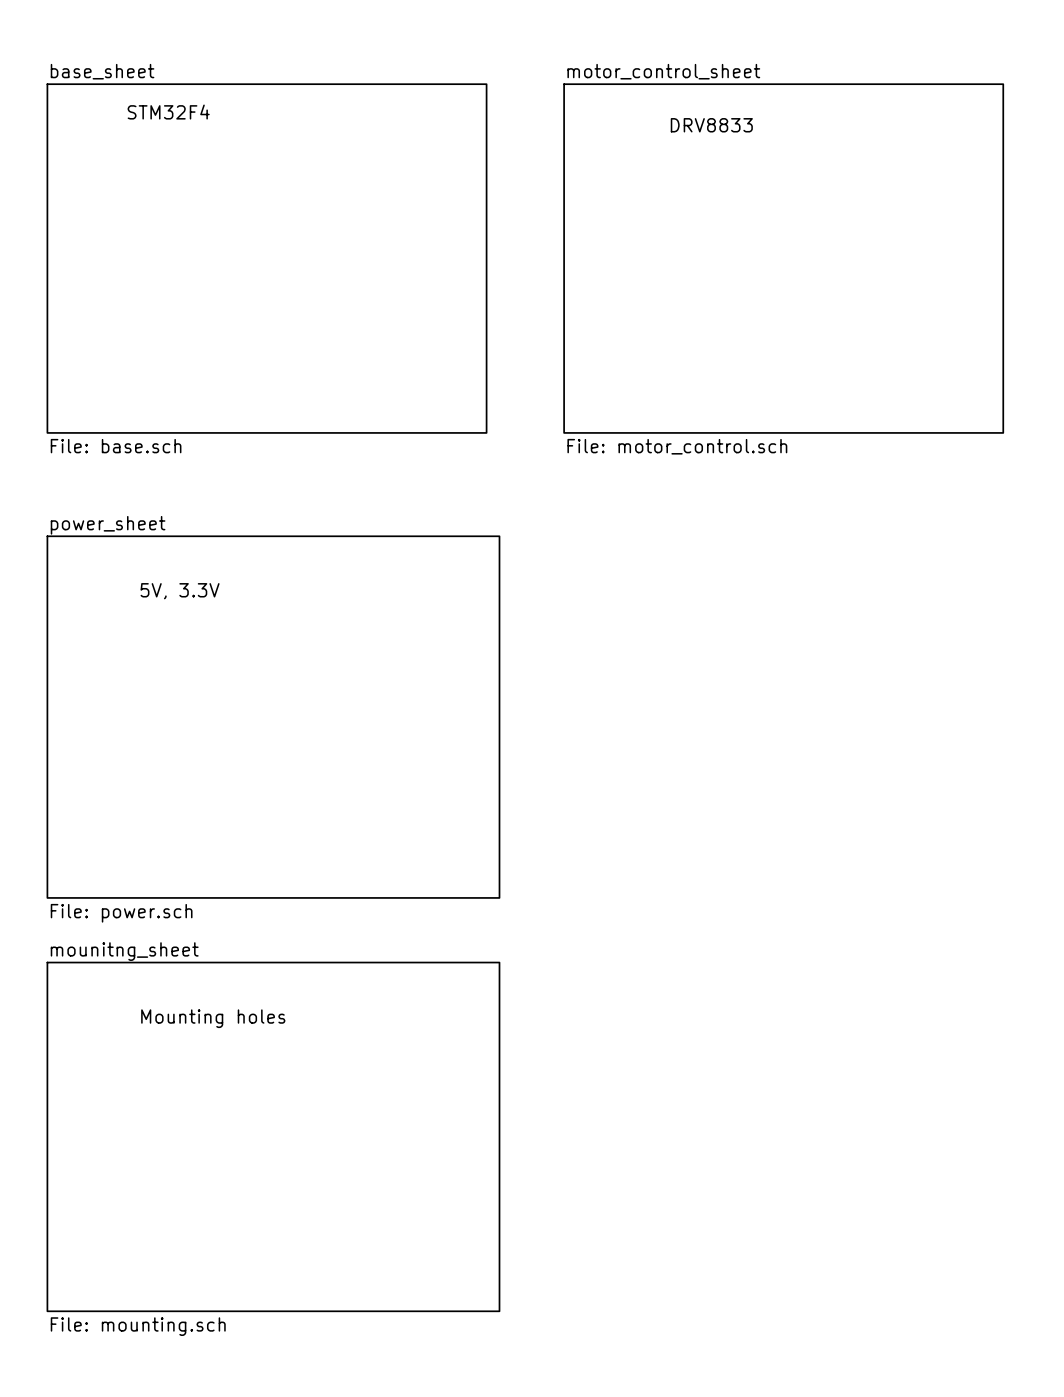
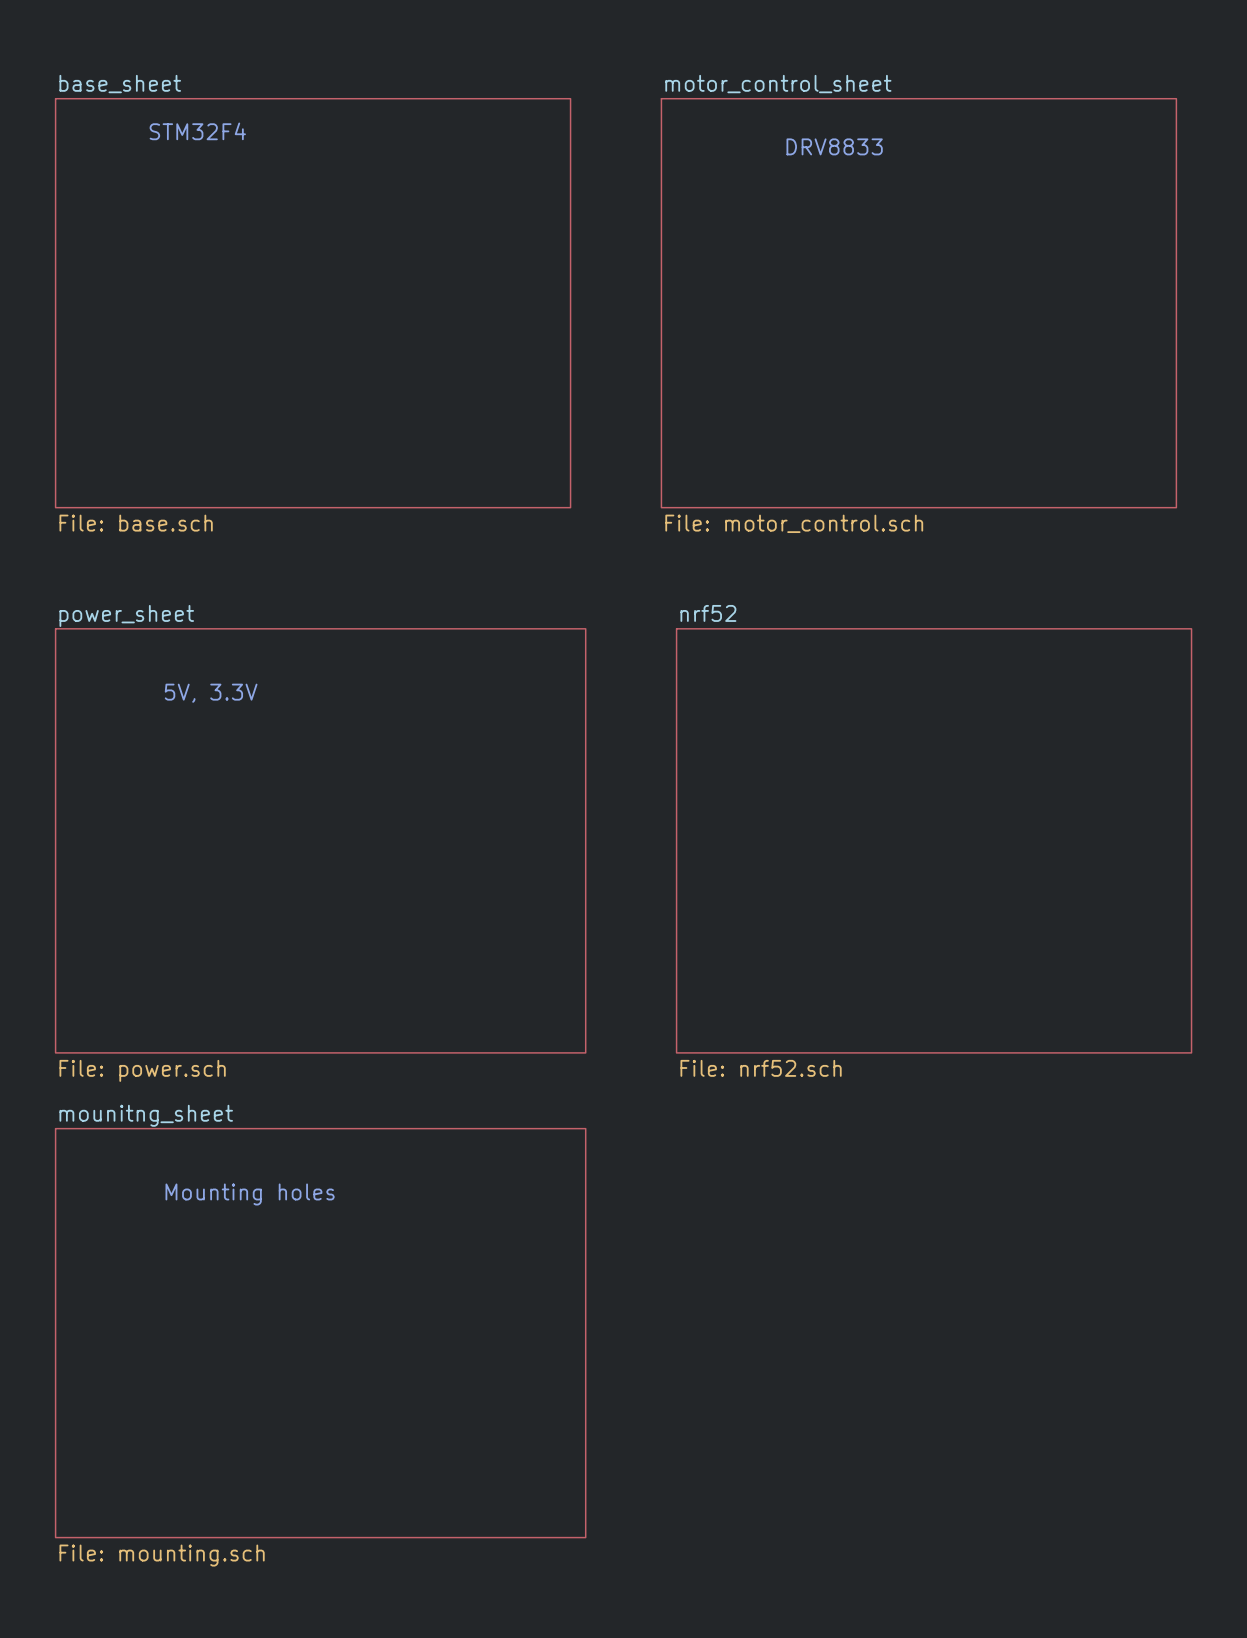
sheet nrf52: none -> File: nrf52.sch (934, 840)

